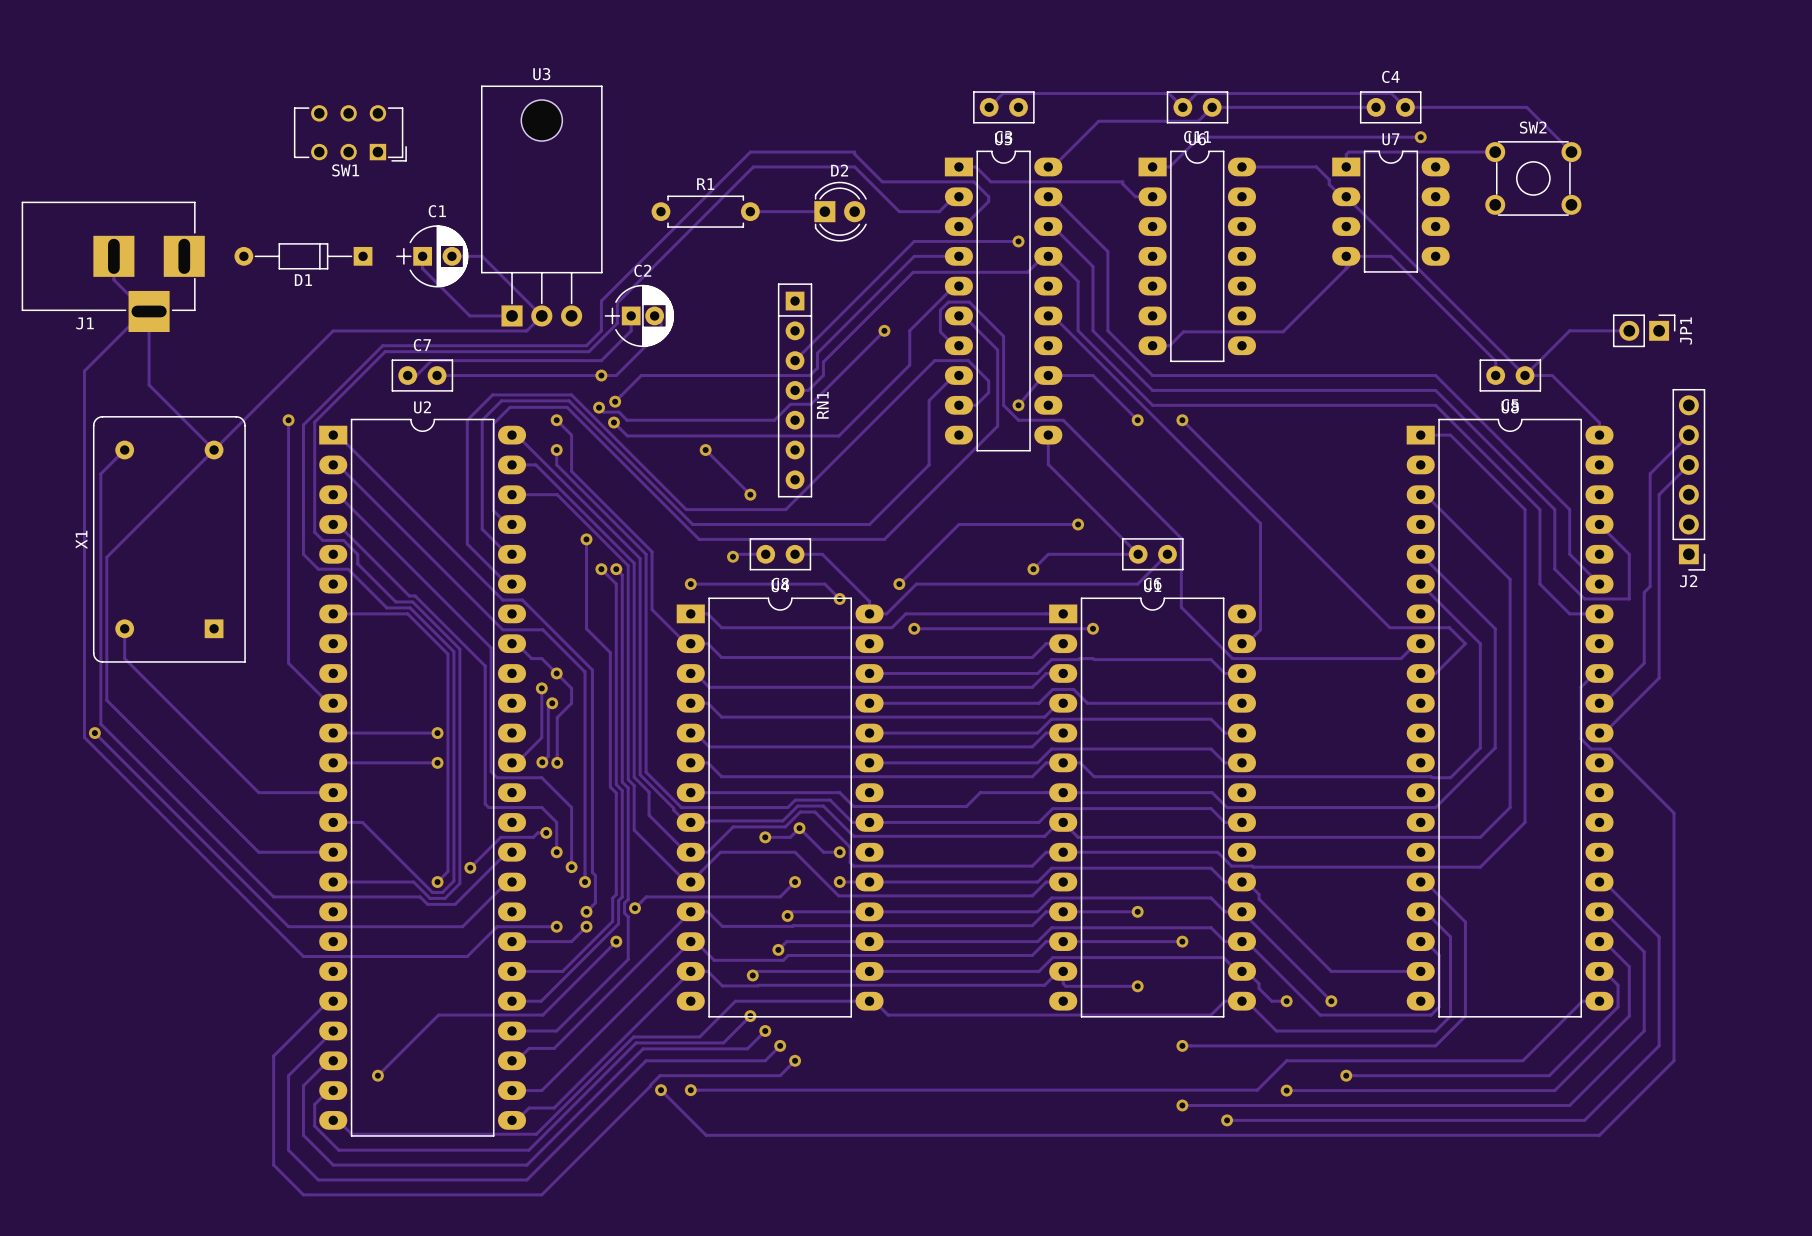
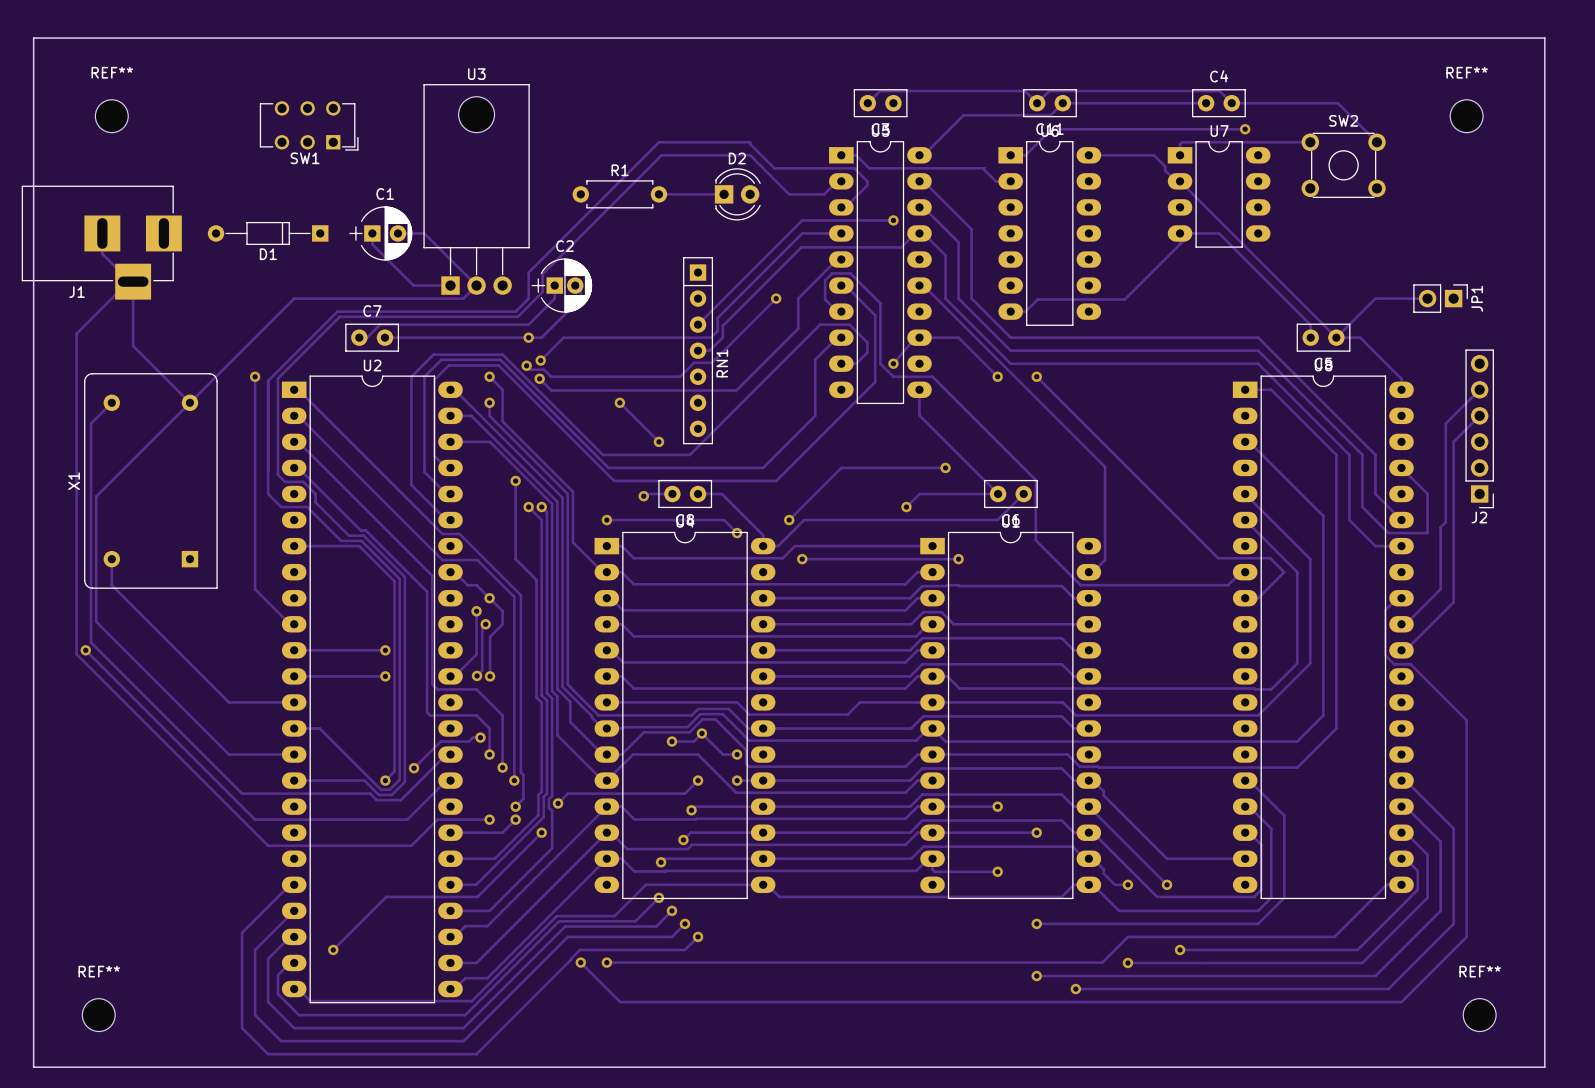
board edge: none -> (33, 38) (33, 1067) (1544, 1067) (1544, 38) (33, 38)
REF**: none -> (111, 116)
REF**: none -> (1466, 116)
REF**: none -> (98, 1015)
REF**: none -> (1479, 1015)

